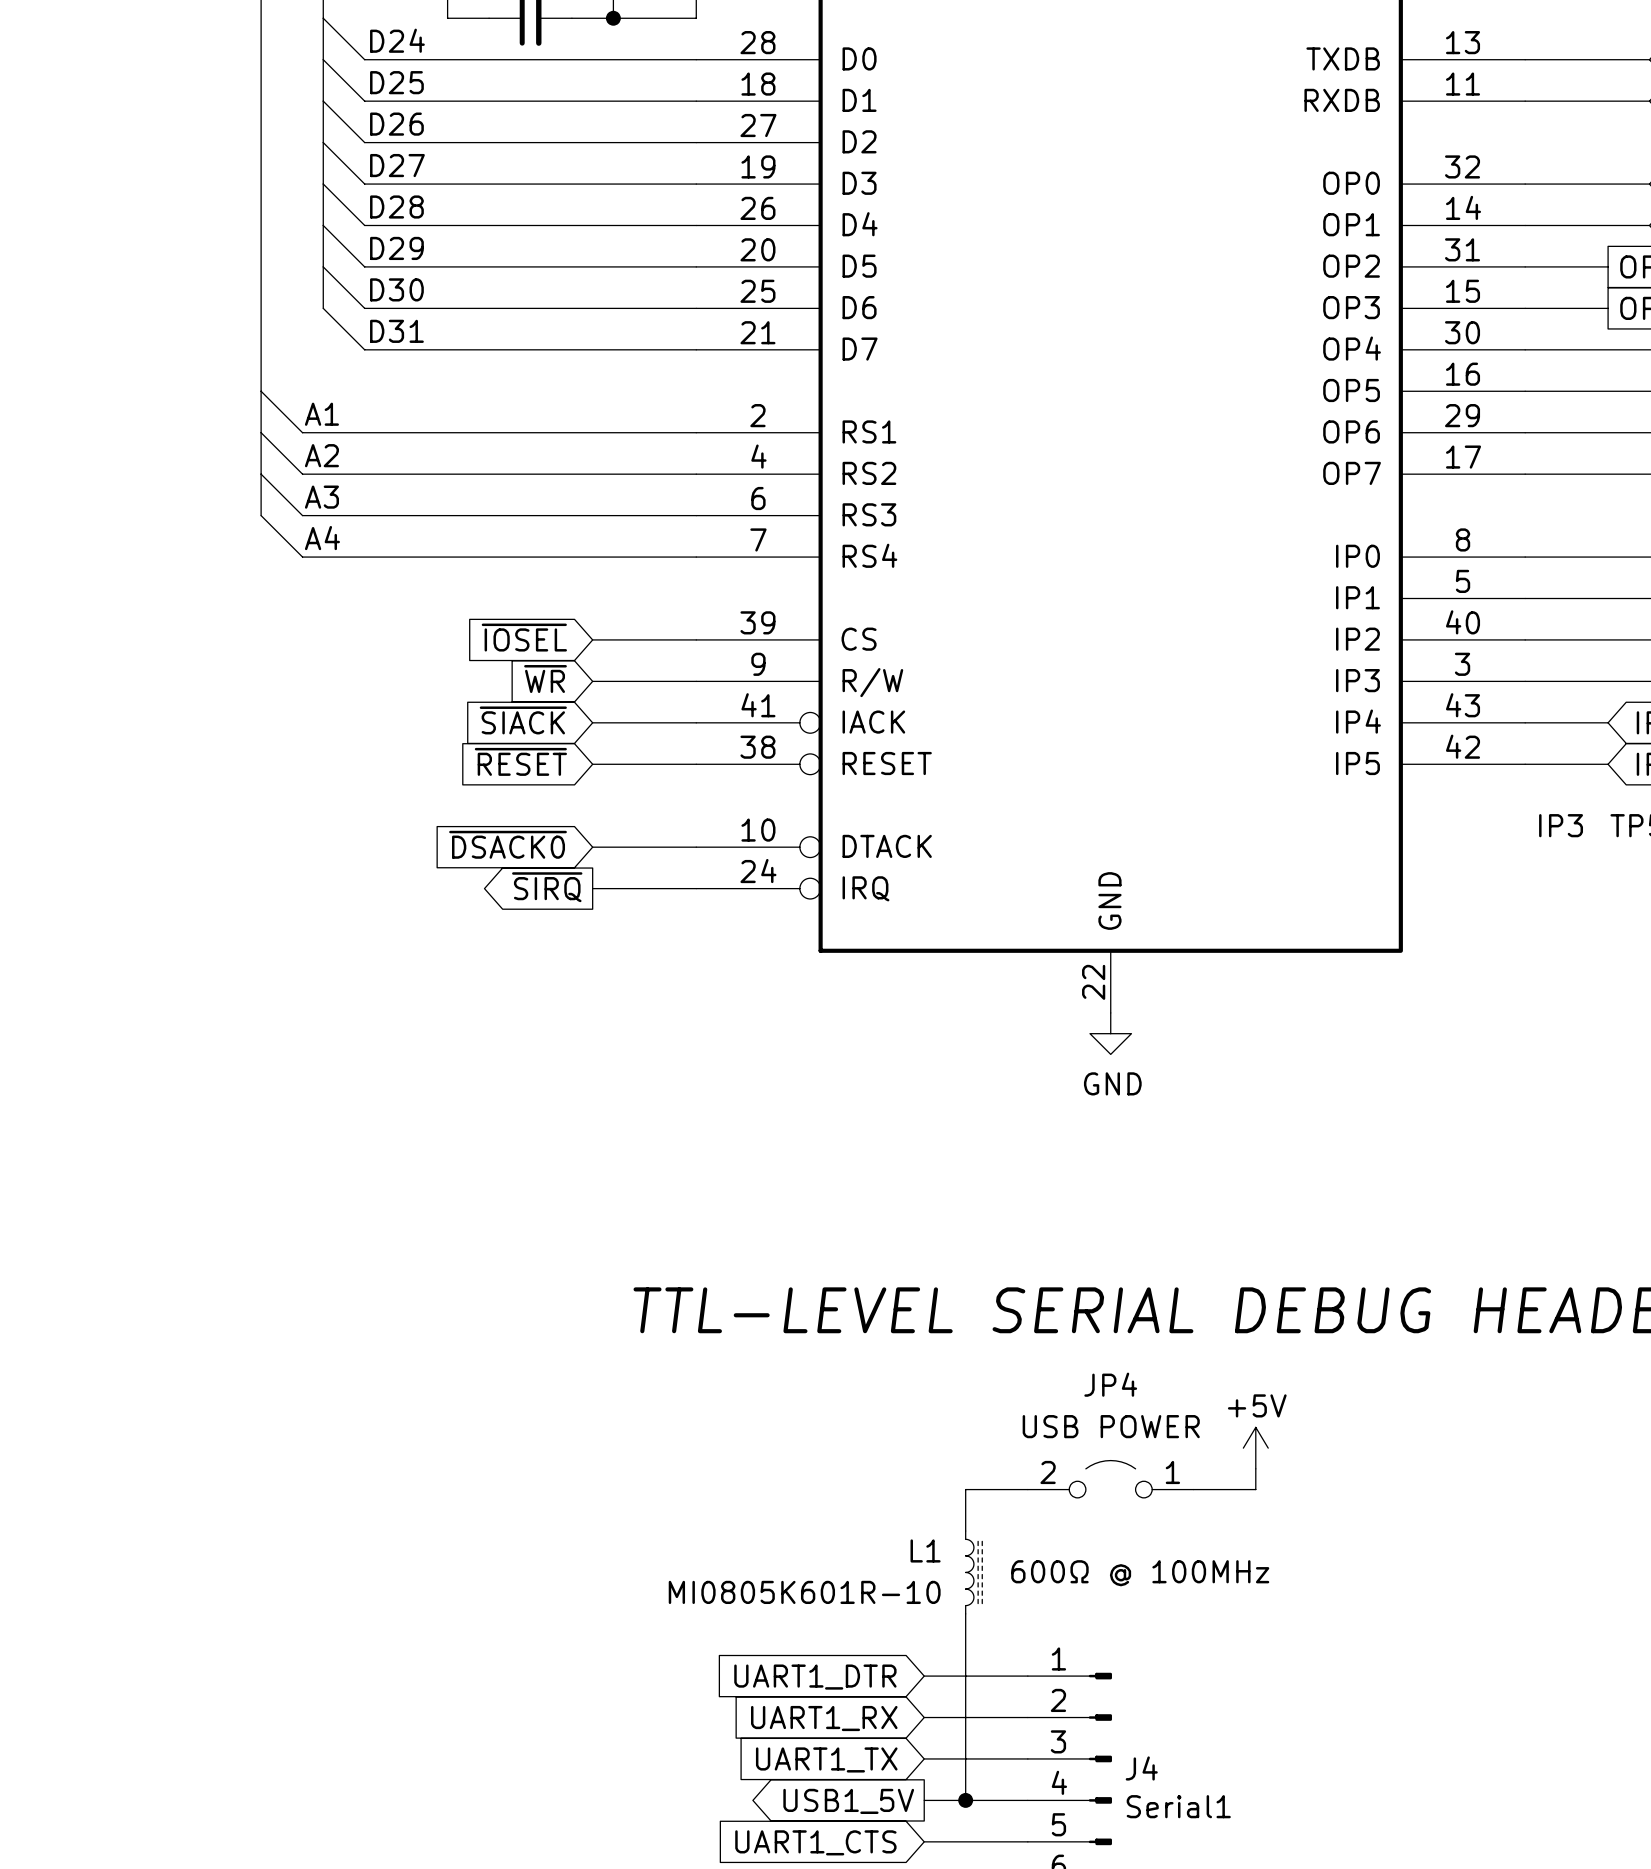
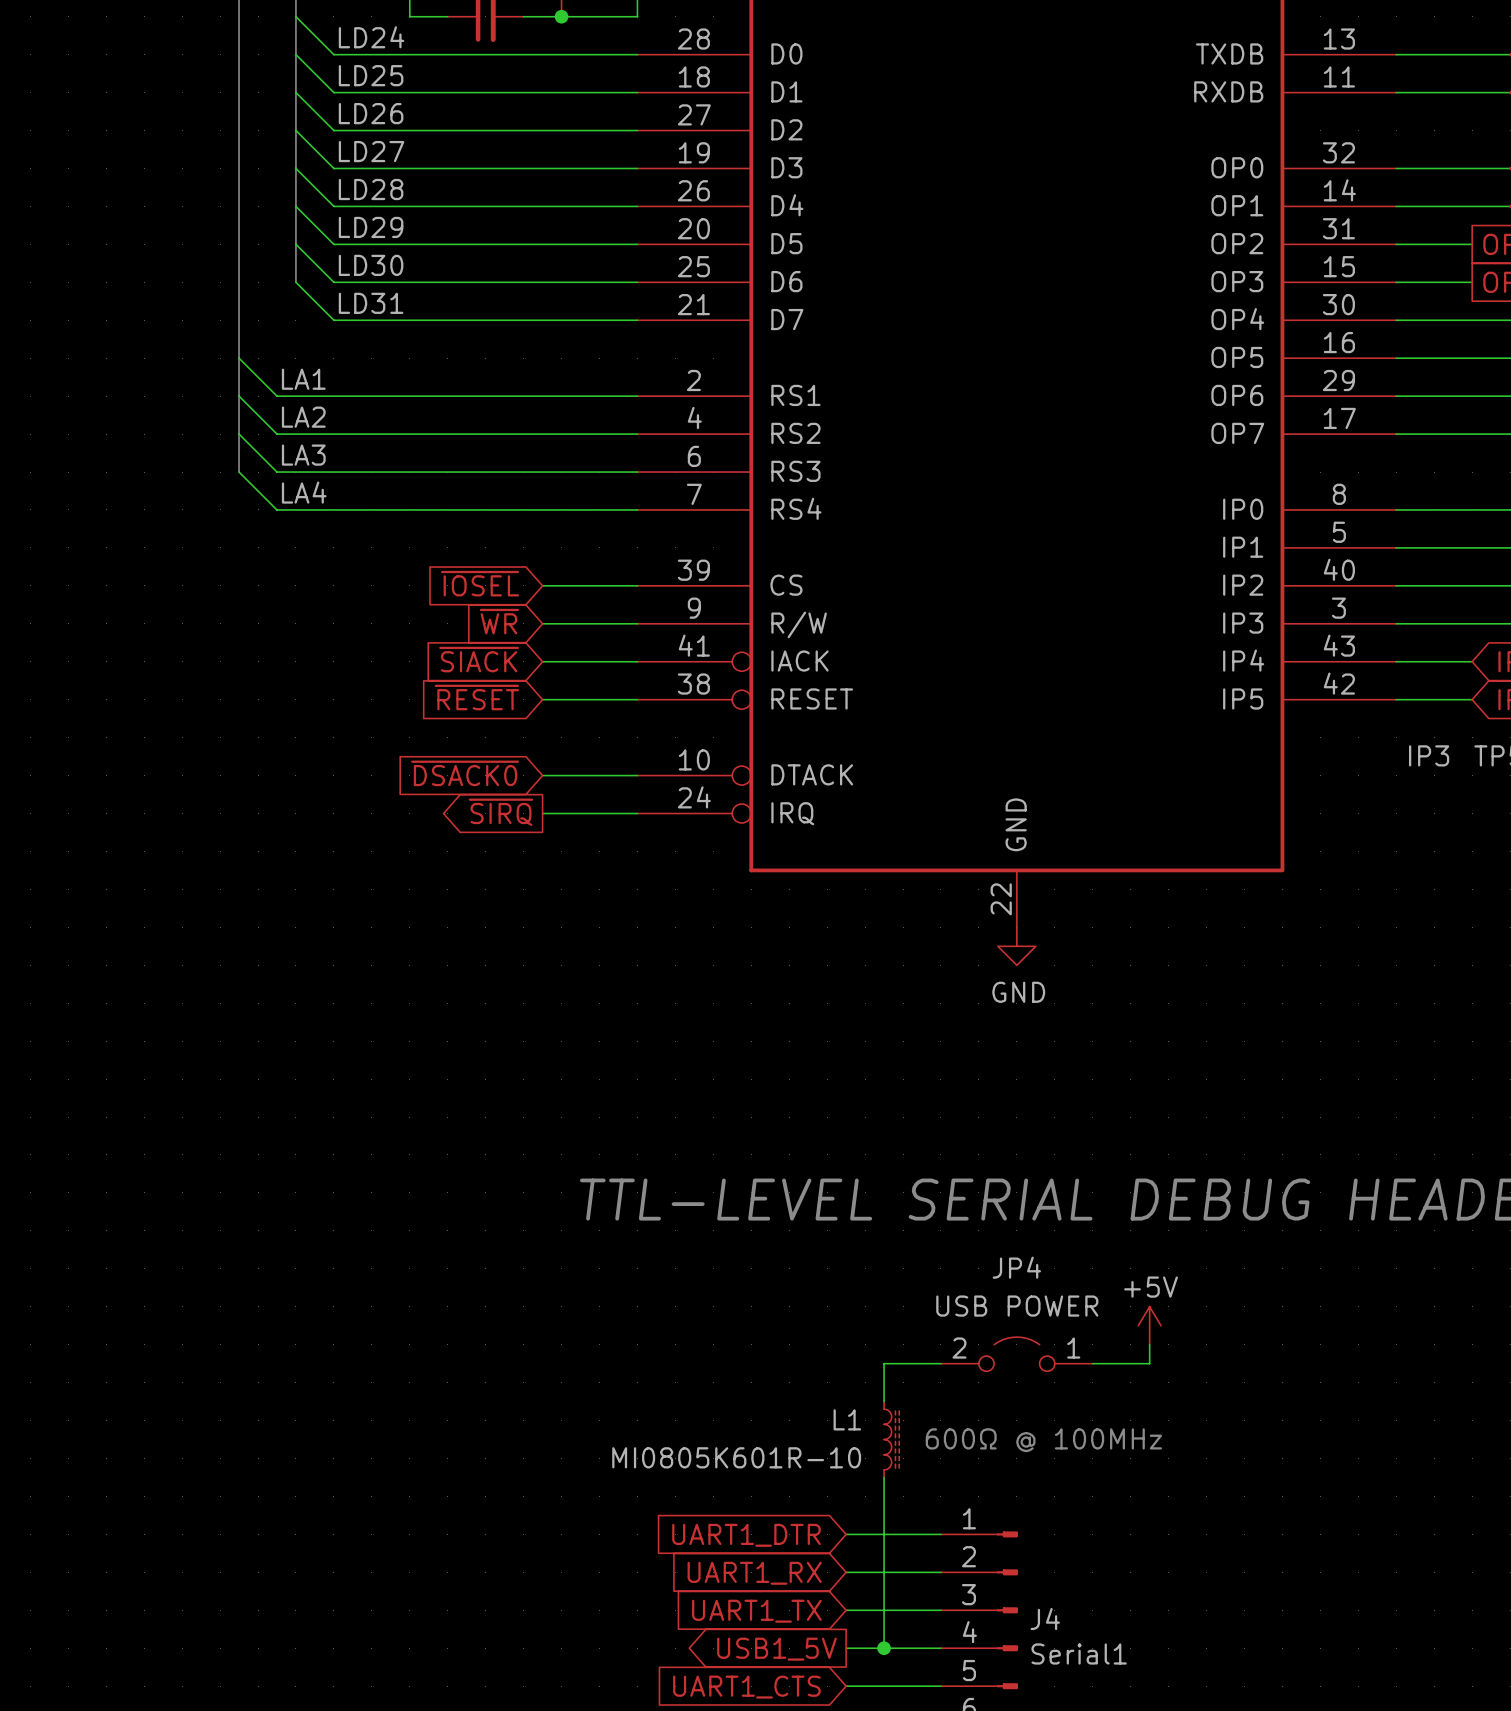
label: D24 (397, 40) -> LD24 (371, 37)
label: D25 (396, 82) -> LD25 (371, 75)
label: D26 (396, 124) -> LD26 (371, 113)
label: D27 (397, 165) -> LD27 (371, 151)
label: D28 (396, 207) -> LD28 (371, 189)
label: D29 (396, 248) -> LD29 (371, 227)
label: D30 (396, 289) -> LD30 (371, 265)
label: D31 (396, 331) -> LD31 (371, 303)
label: A1 (321, 414) -> LA1 (303, 379)
label: A2 (321, 455) -> LA2 (303, 417)
label: A3 (321, 497) -> LA3 (303, 455)
label: A4 (322, 538) -> LA4 (304, 492)

